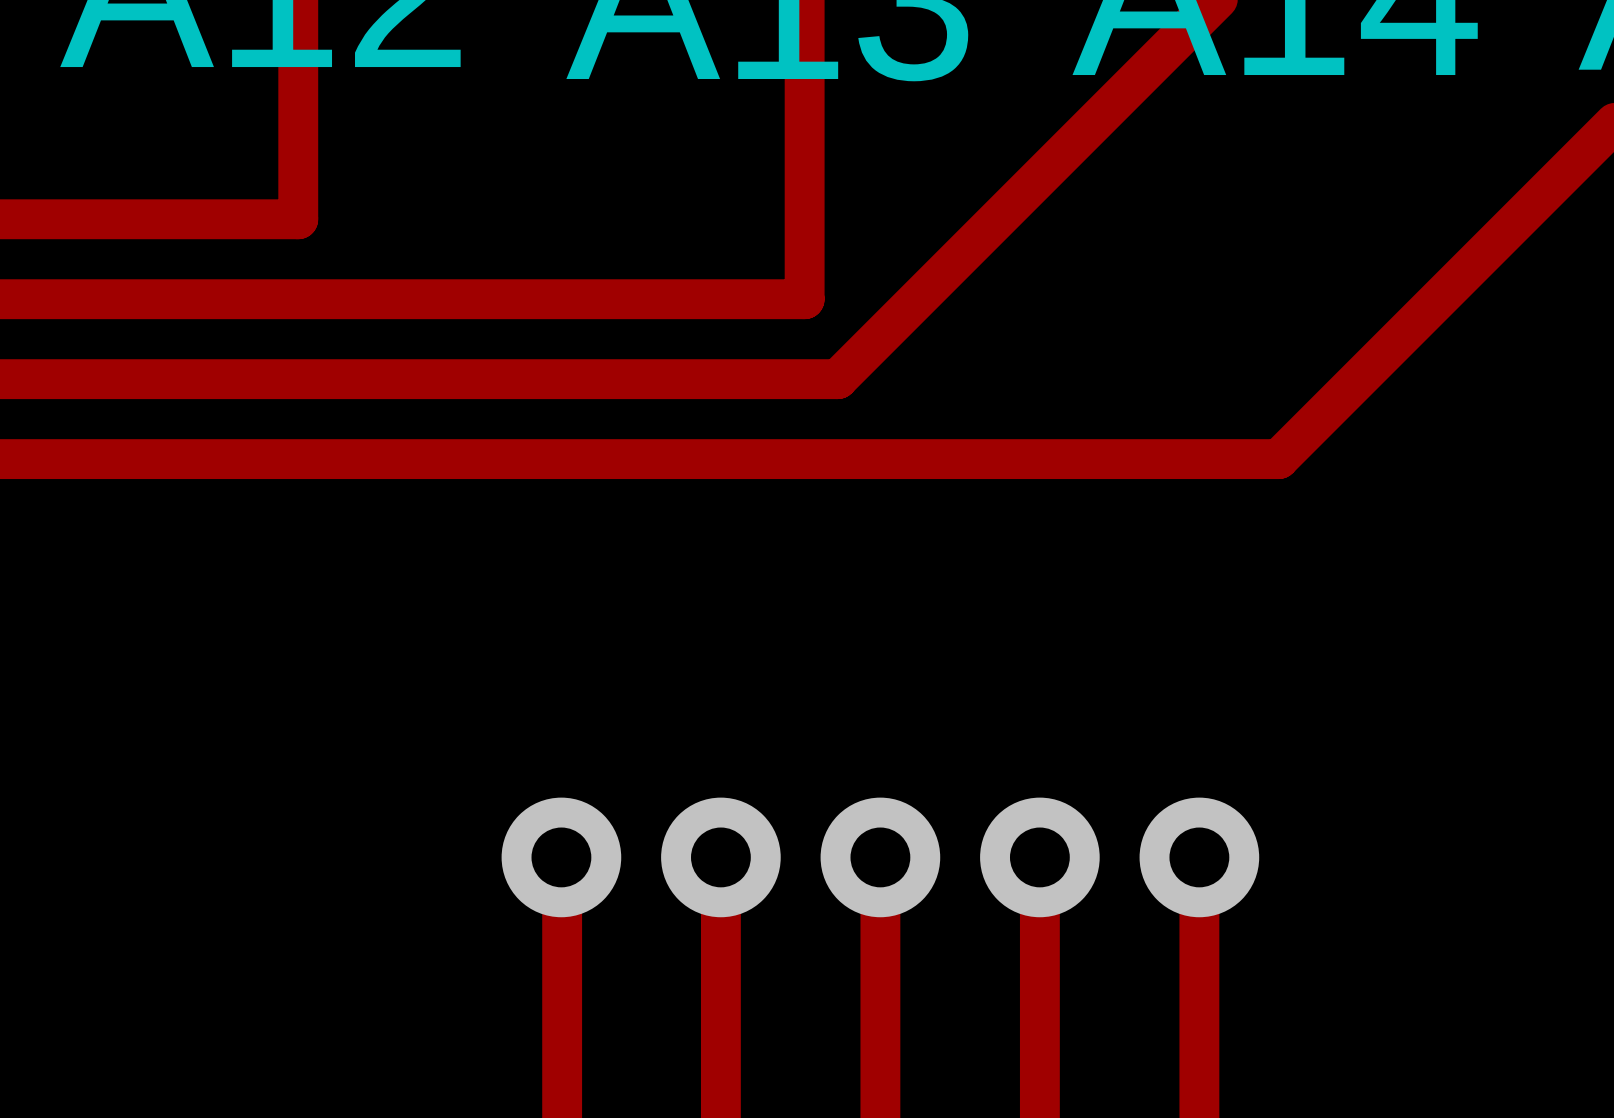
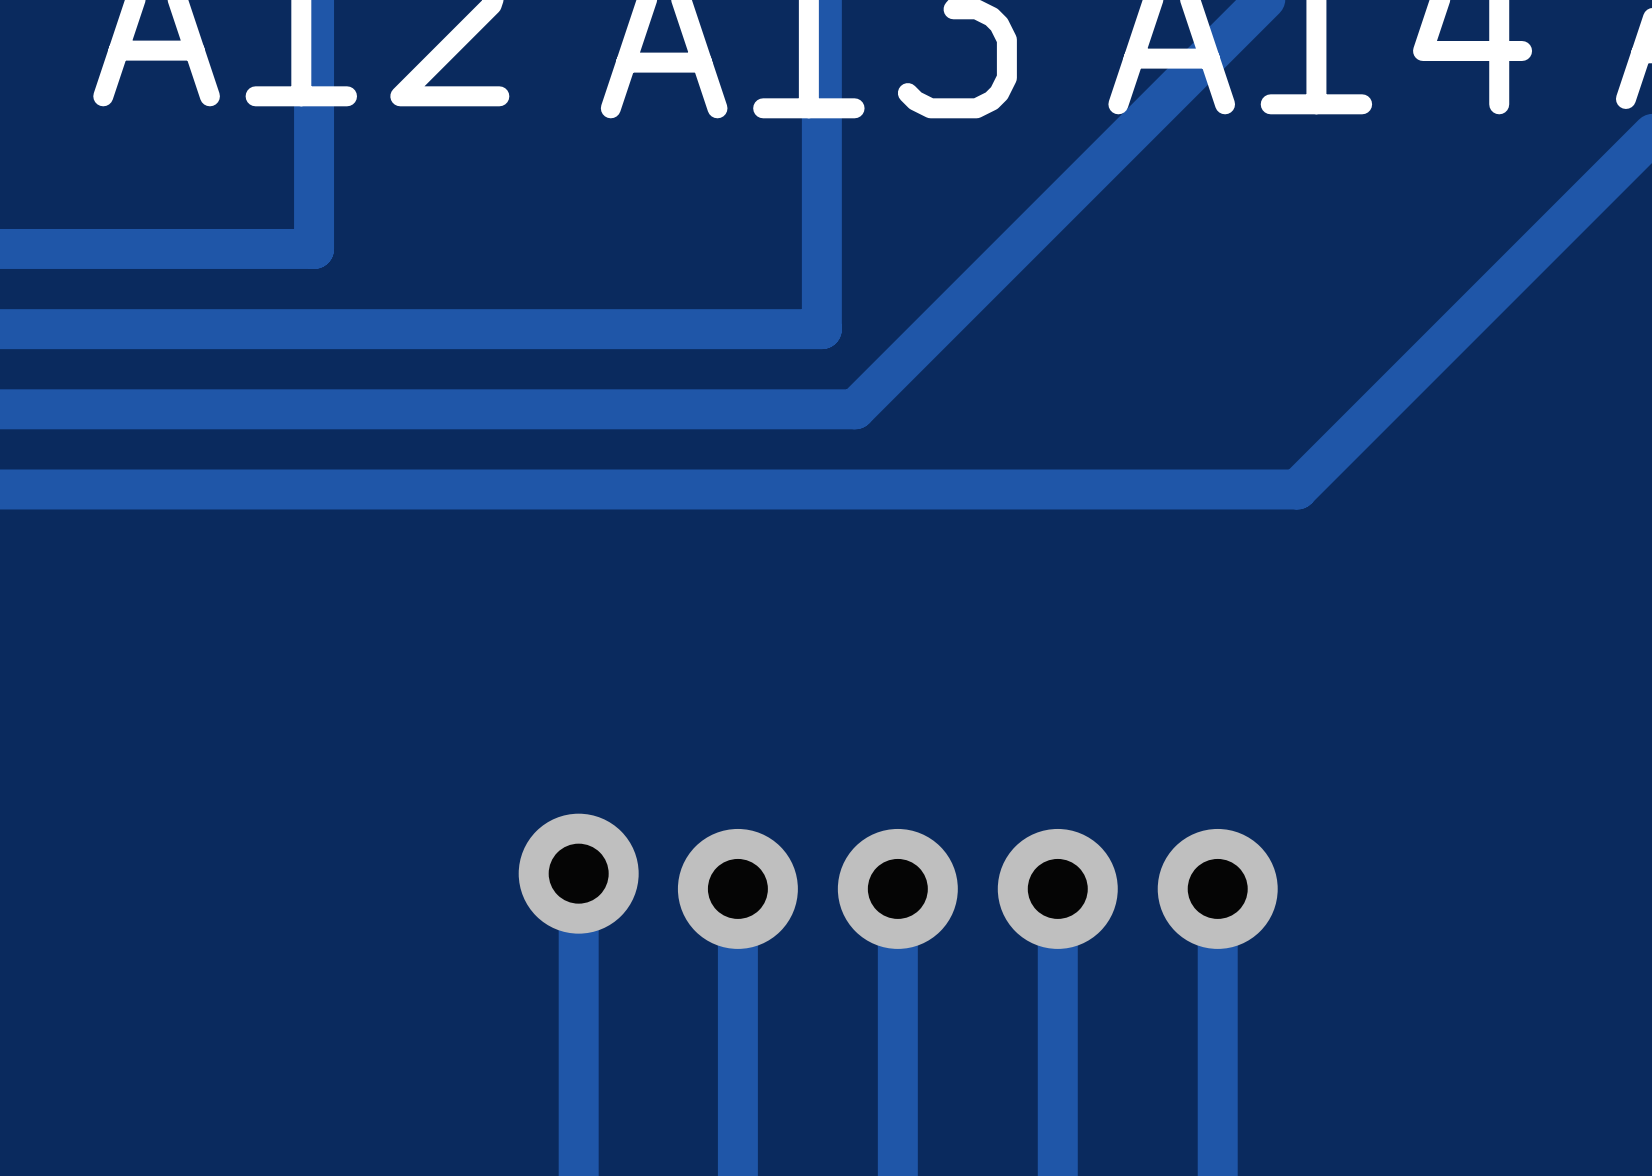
via position: (561, 857) -> (578, 873)

